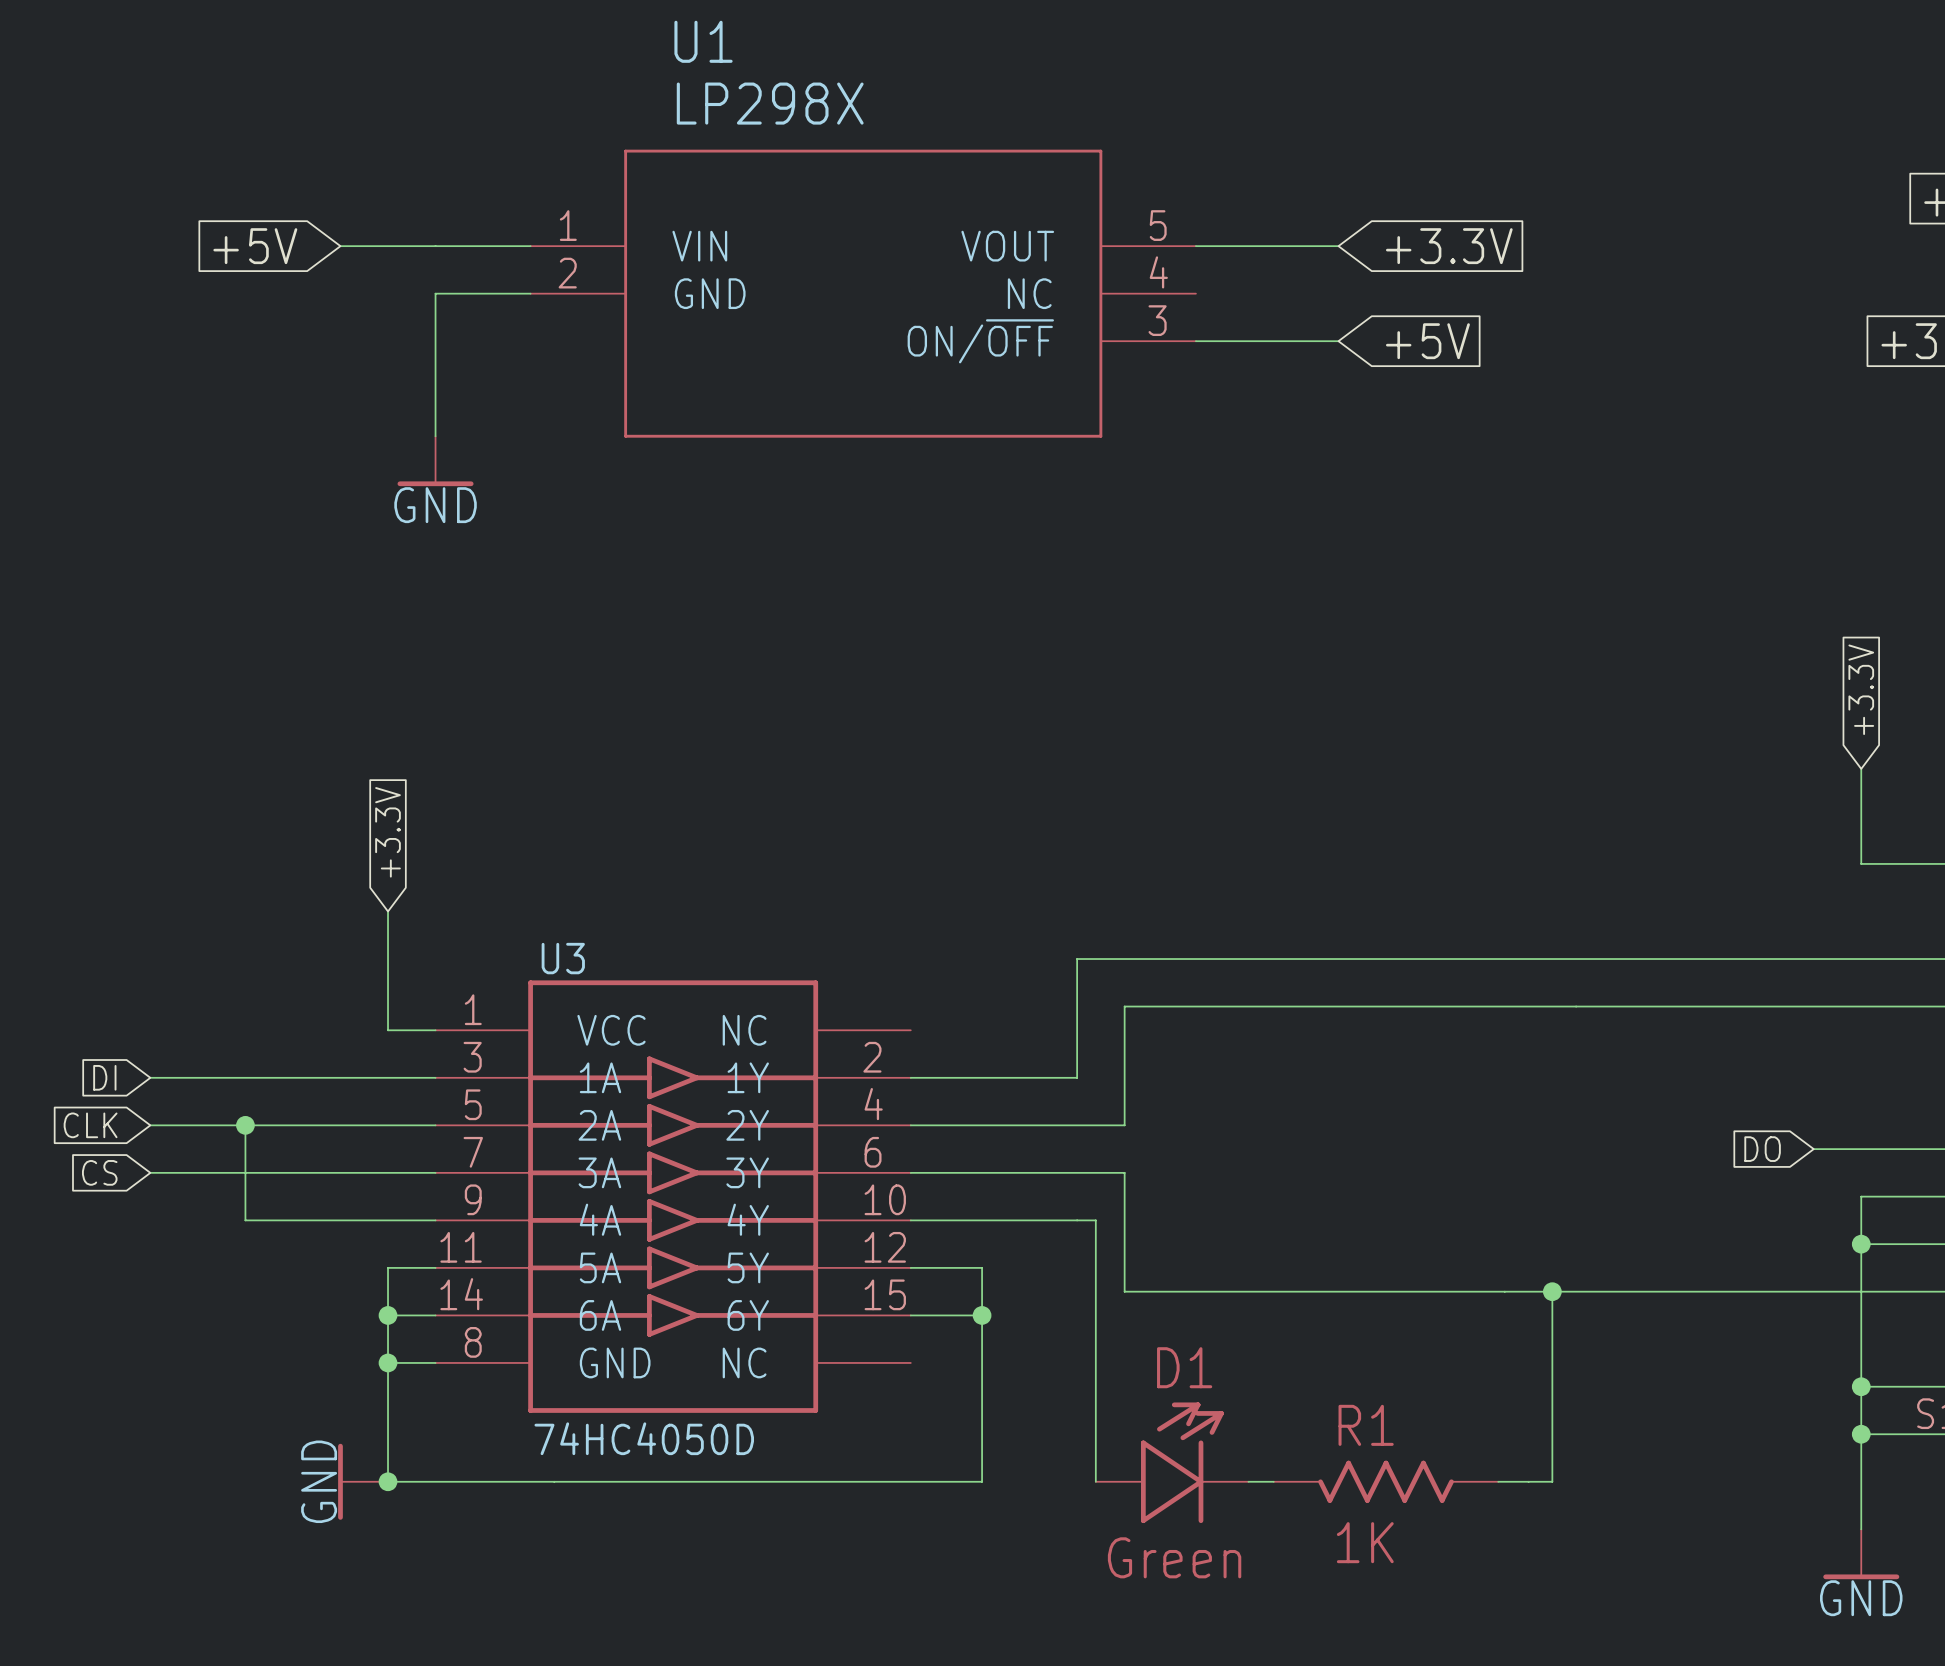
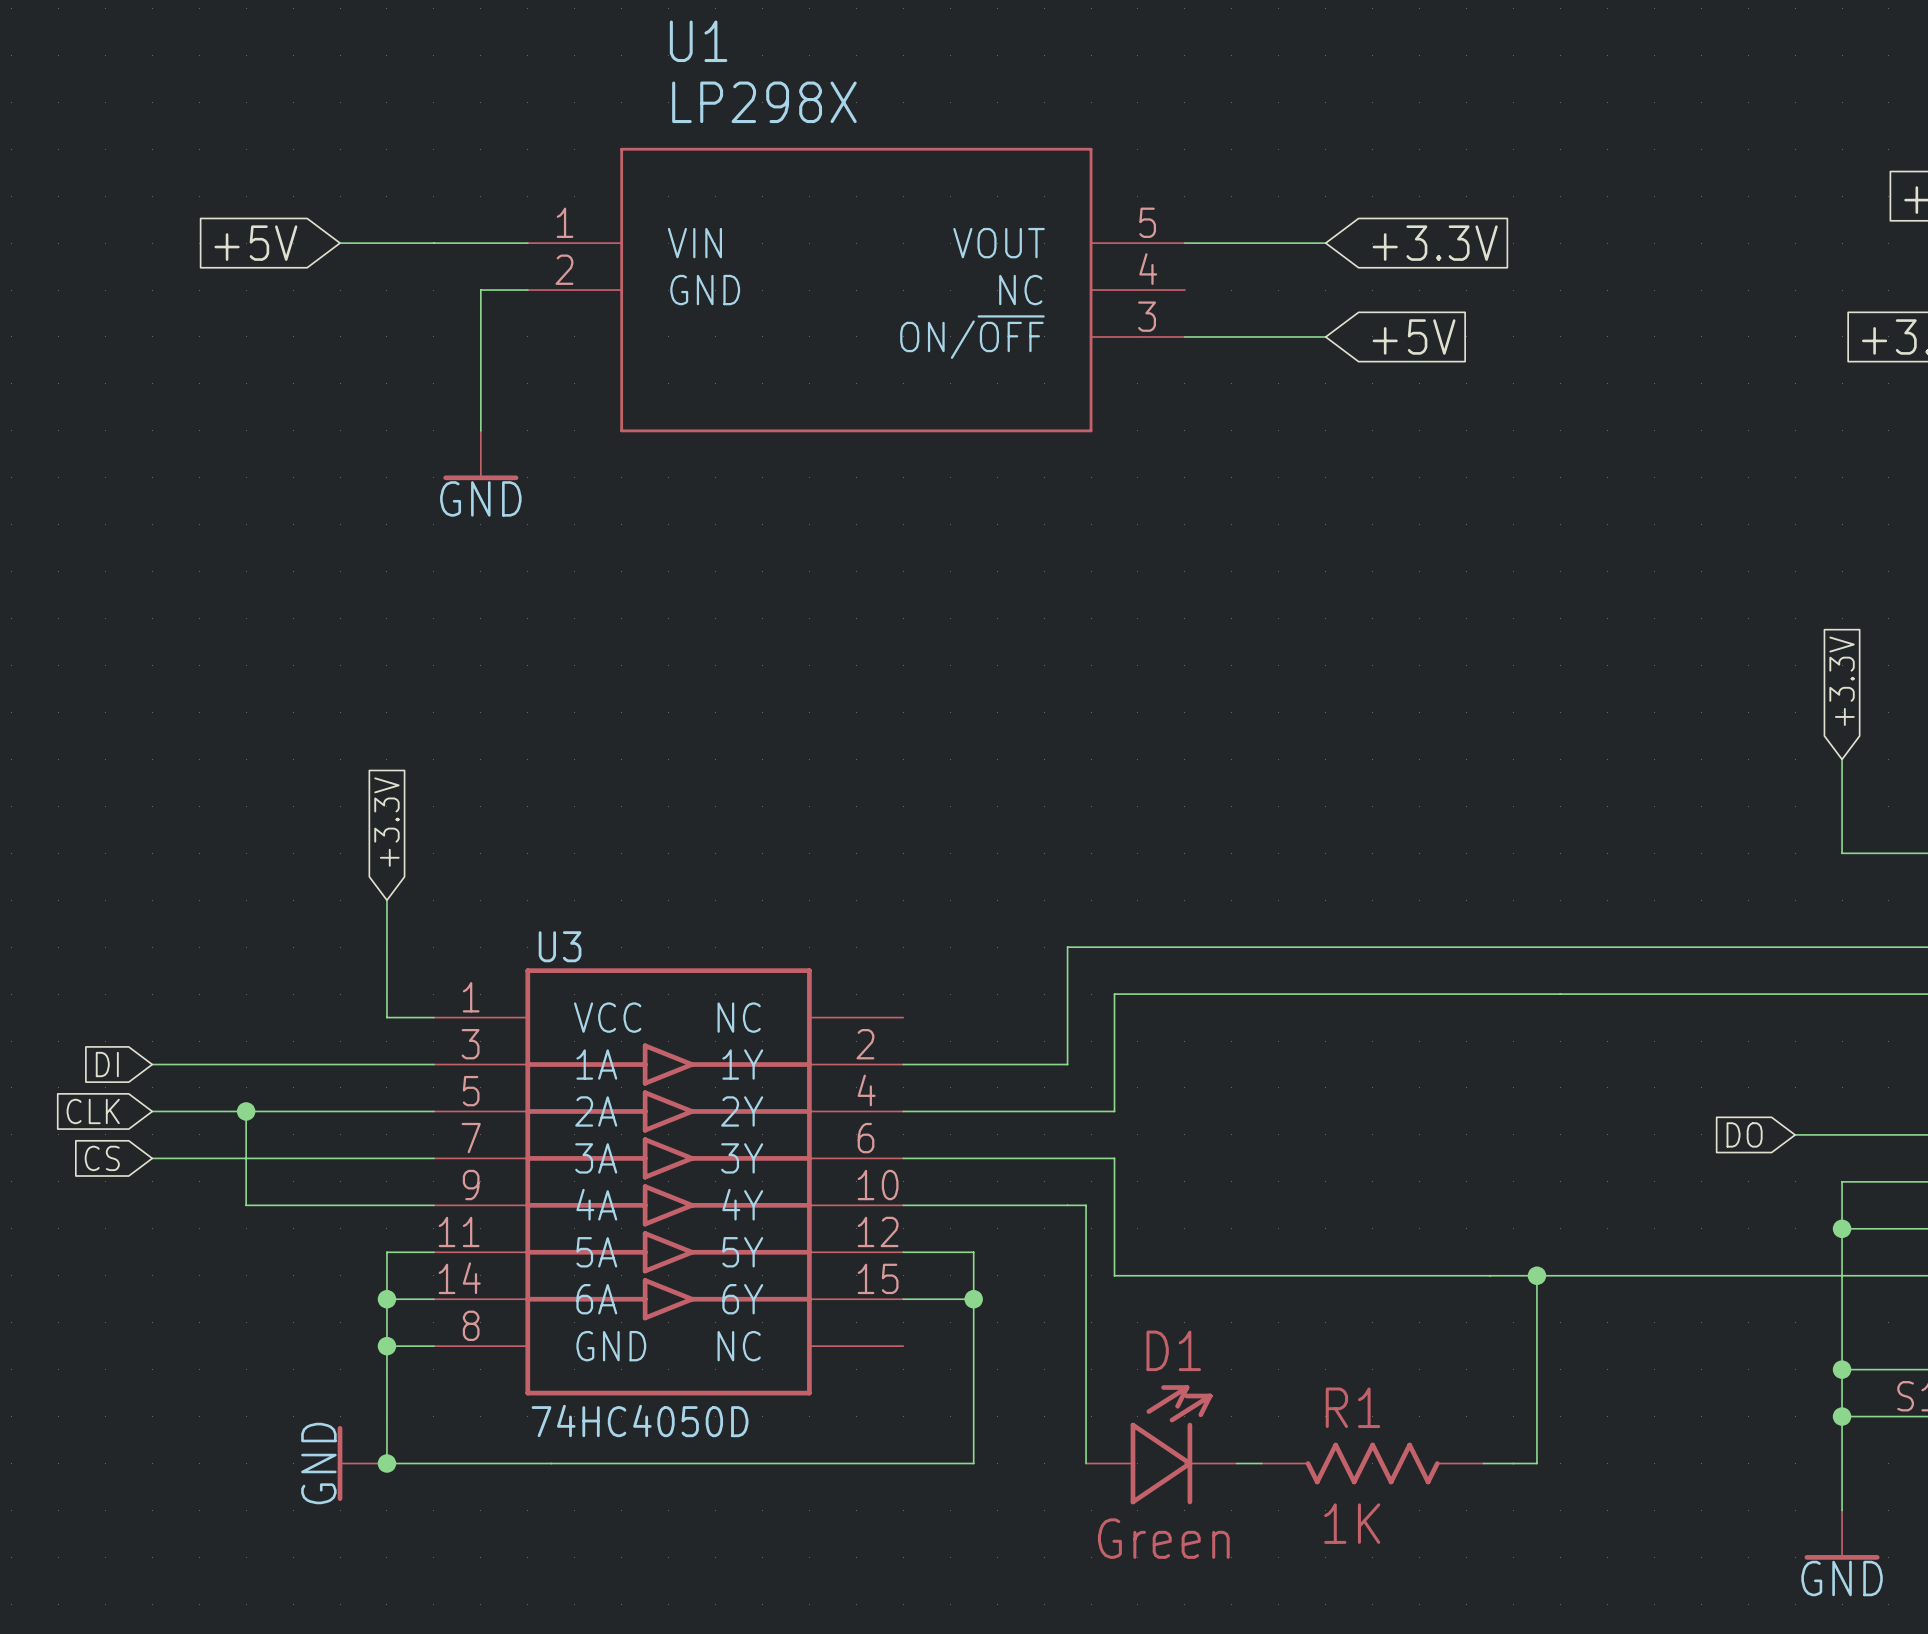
wire: (483, 293) (435, 293) (435, 436) -> (480, 290) (480, 430)
power symbol position: GND (435, 461) -> GND (480, 455)

